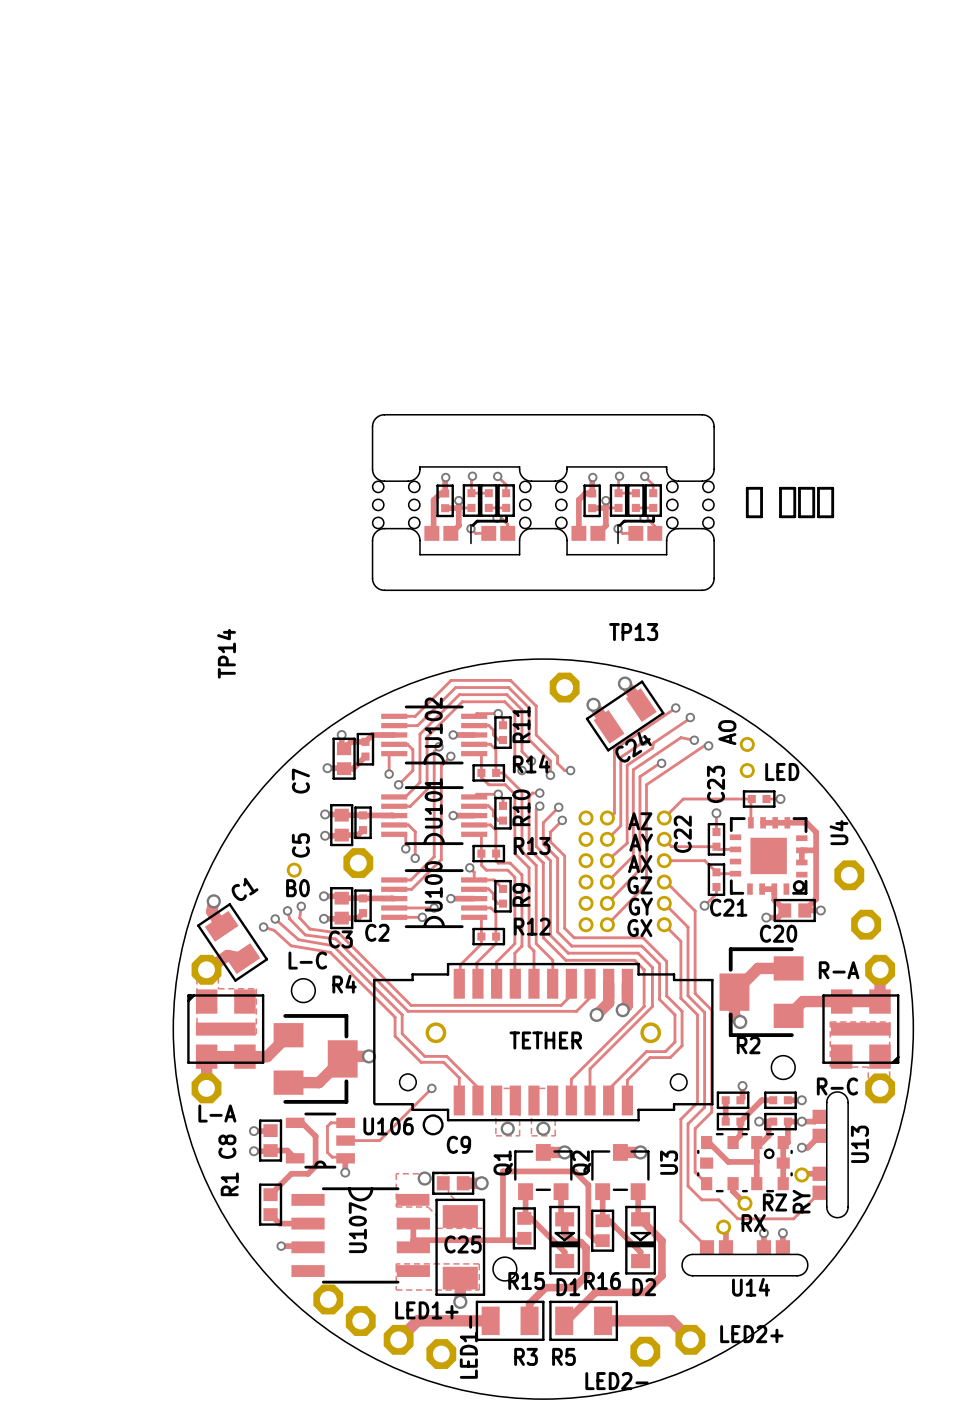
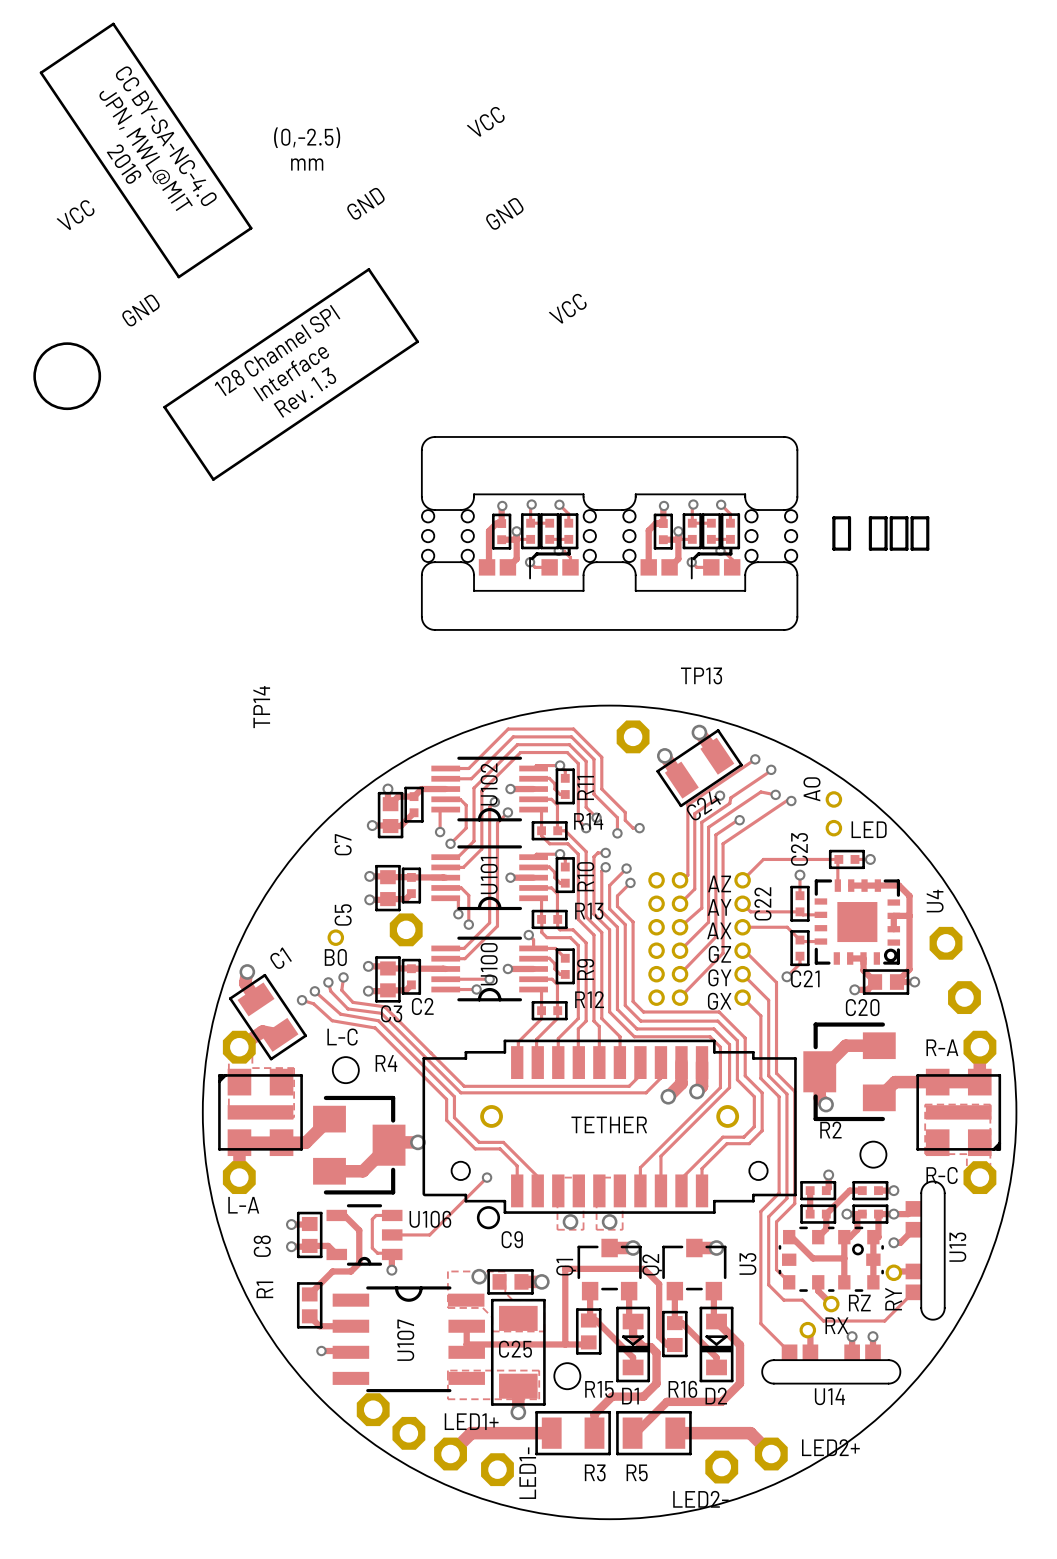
line: none -> (113, 23) (41, 72) (178, 277) (251, 228) (113, 23)
text: none -> VCC (485, 121)
text: none -> CC BY-SA-NC-4.0 (166, 136)
text: none -> (0,-2.5) (307, 137)
text: none -> JPN, MWL@MIT (146, 150)
text: none -> 2016 (124, 164)
text: none -> mm (307, 164)
text: none -> GND (366, 203)
text: none -> GND (504, 213)
text: none -> VCC (75, 215)
line: none -> (368, 269) (417, 341) (213, 479) (164, 407) (368, 269)
text: none -> VCC (567, 308)
text: none -> GND (141, 310)
drawing: none -> [33, 342, 102, 411]
text: none -> 128 Channel SPI (277, 350)
text: none -> Interface (291, 374)
text: none -> Rev. 1.3 (305, 392)

